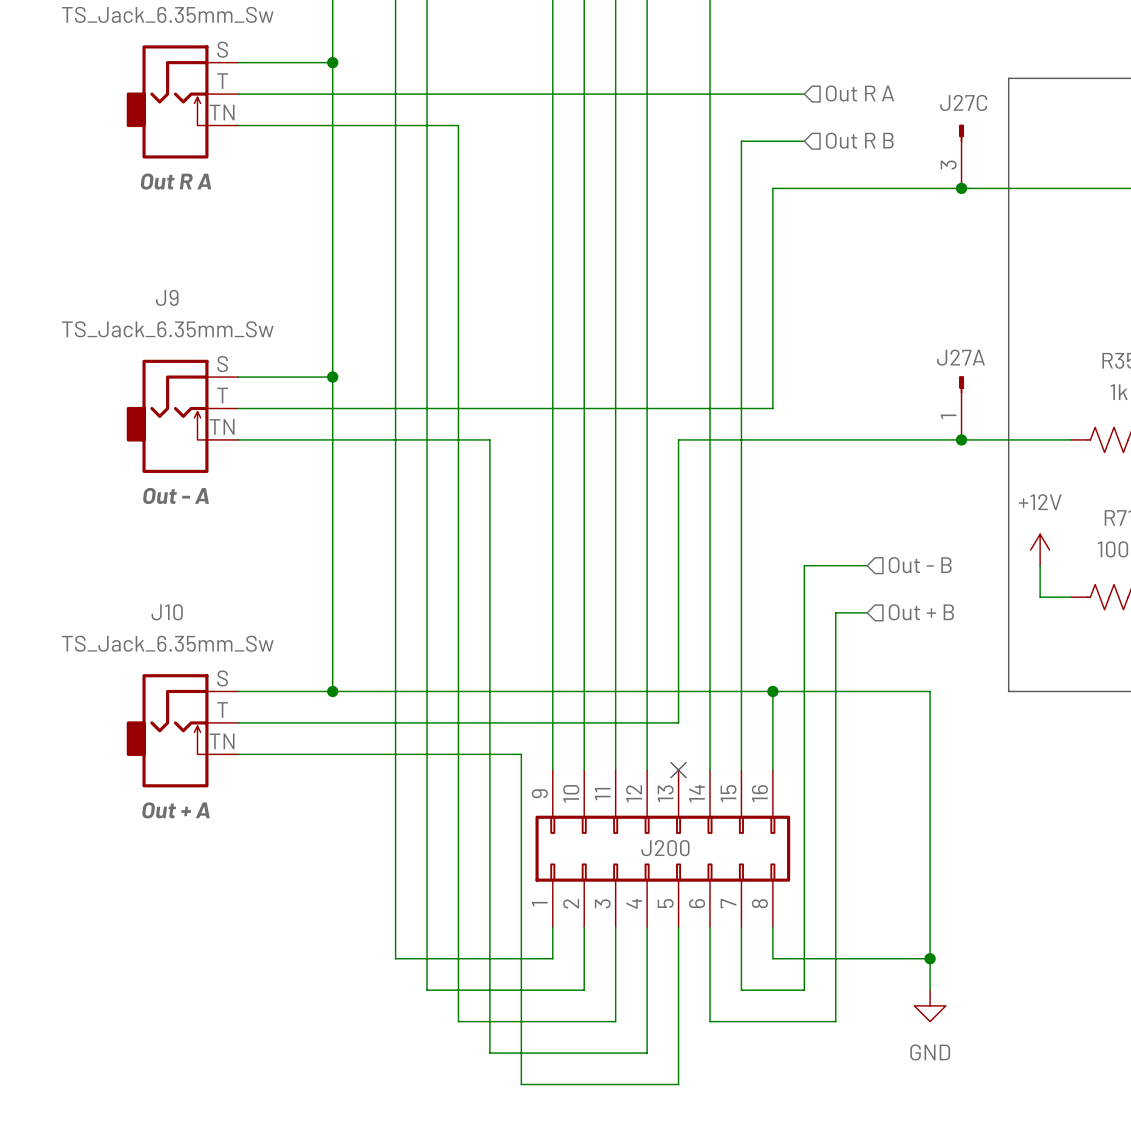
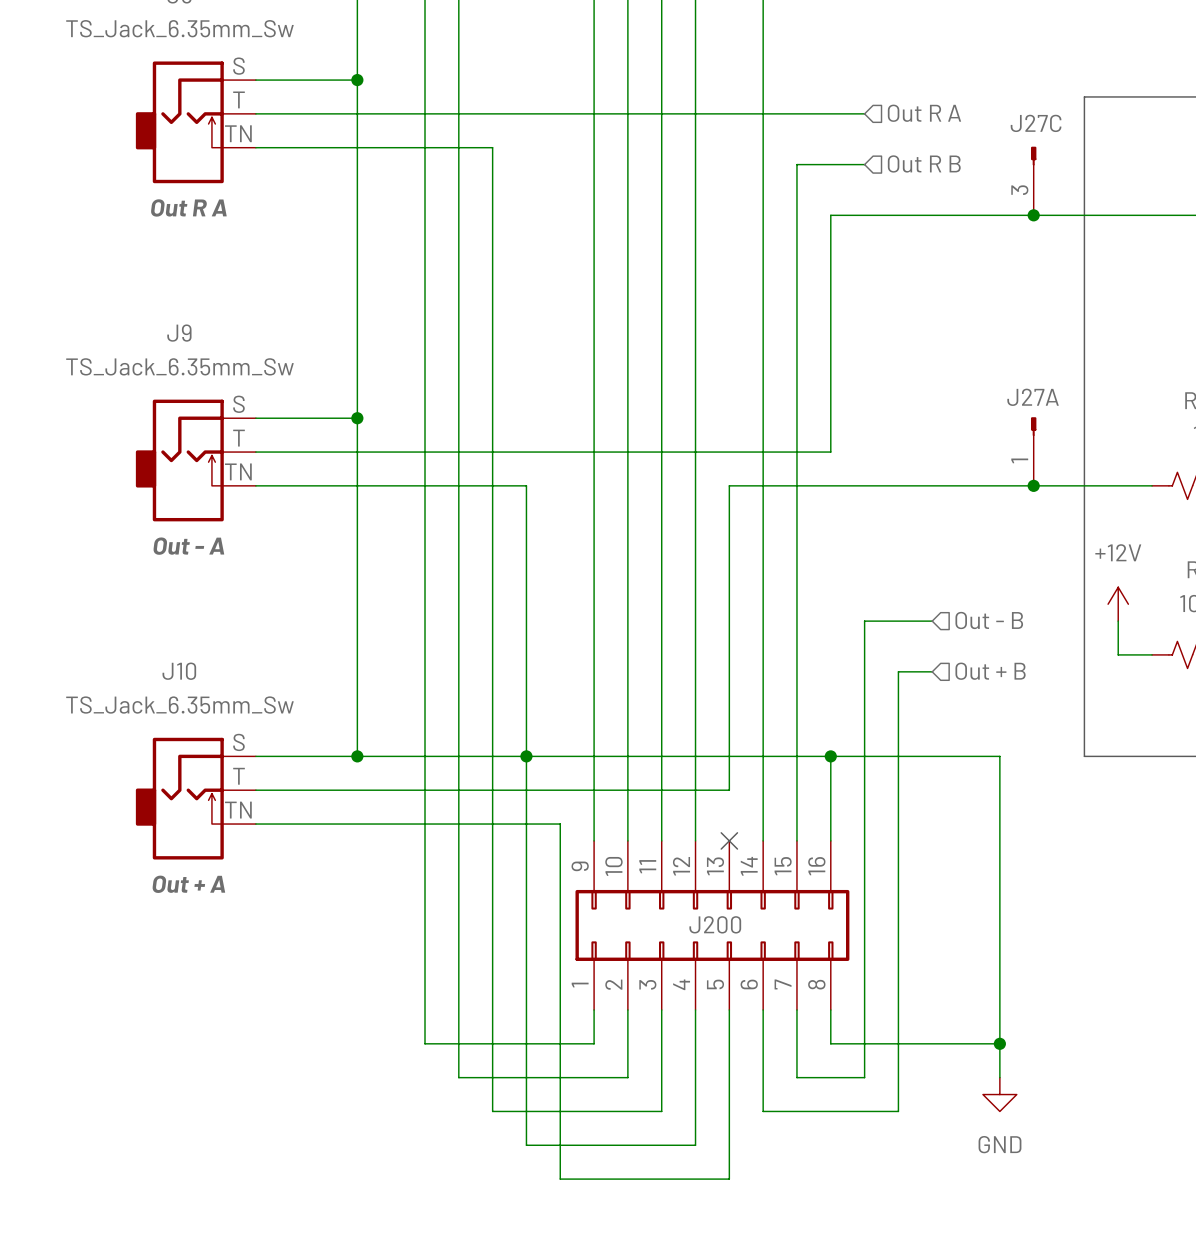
junction: none -> (526, 756)

